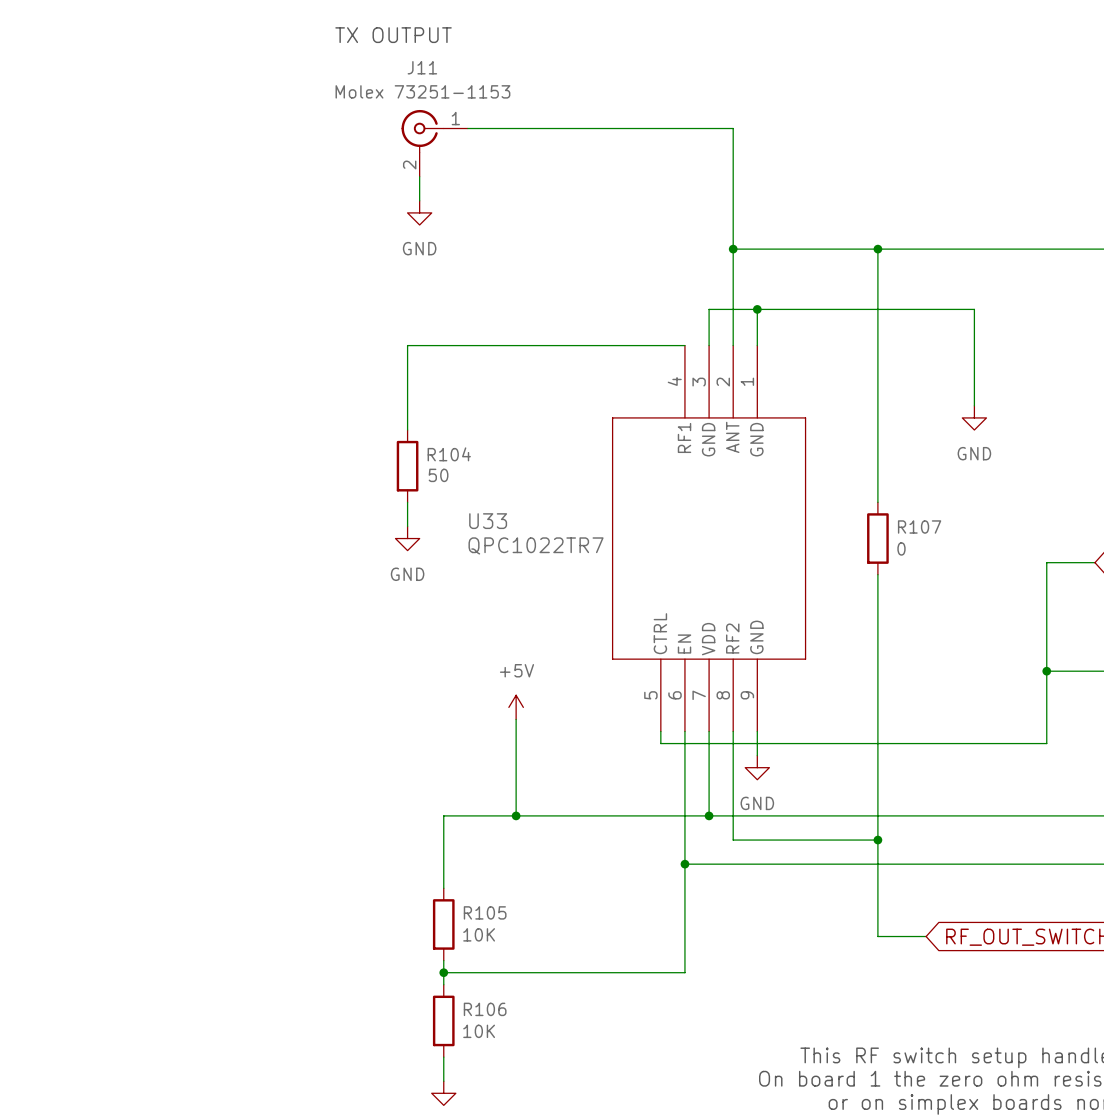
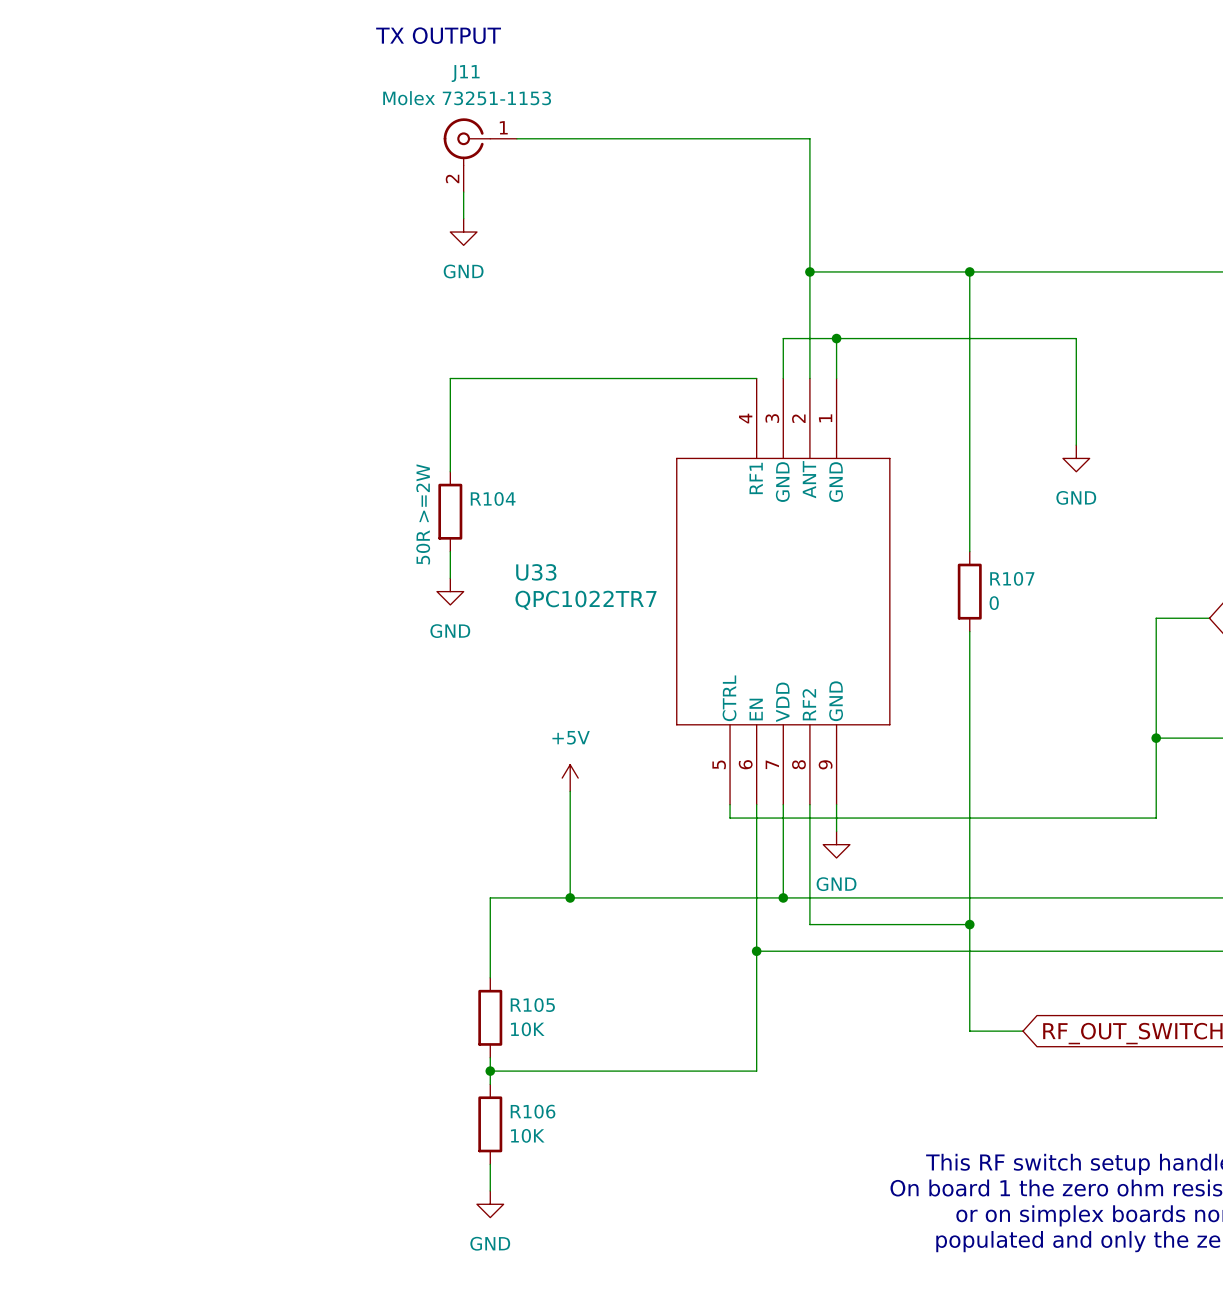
R104 value: 50 (438, 475) -> 50R >=2W (423, 514)

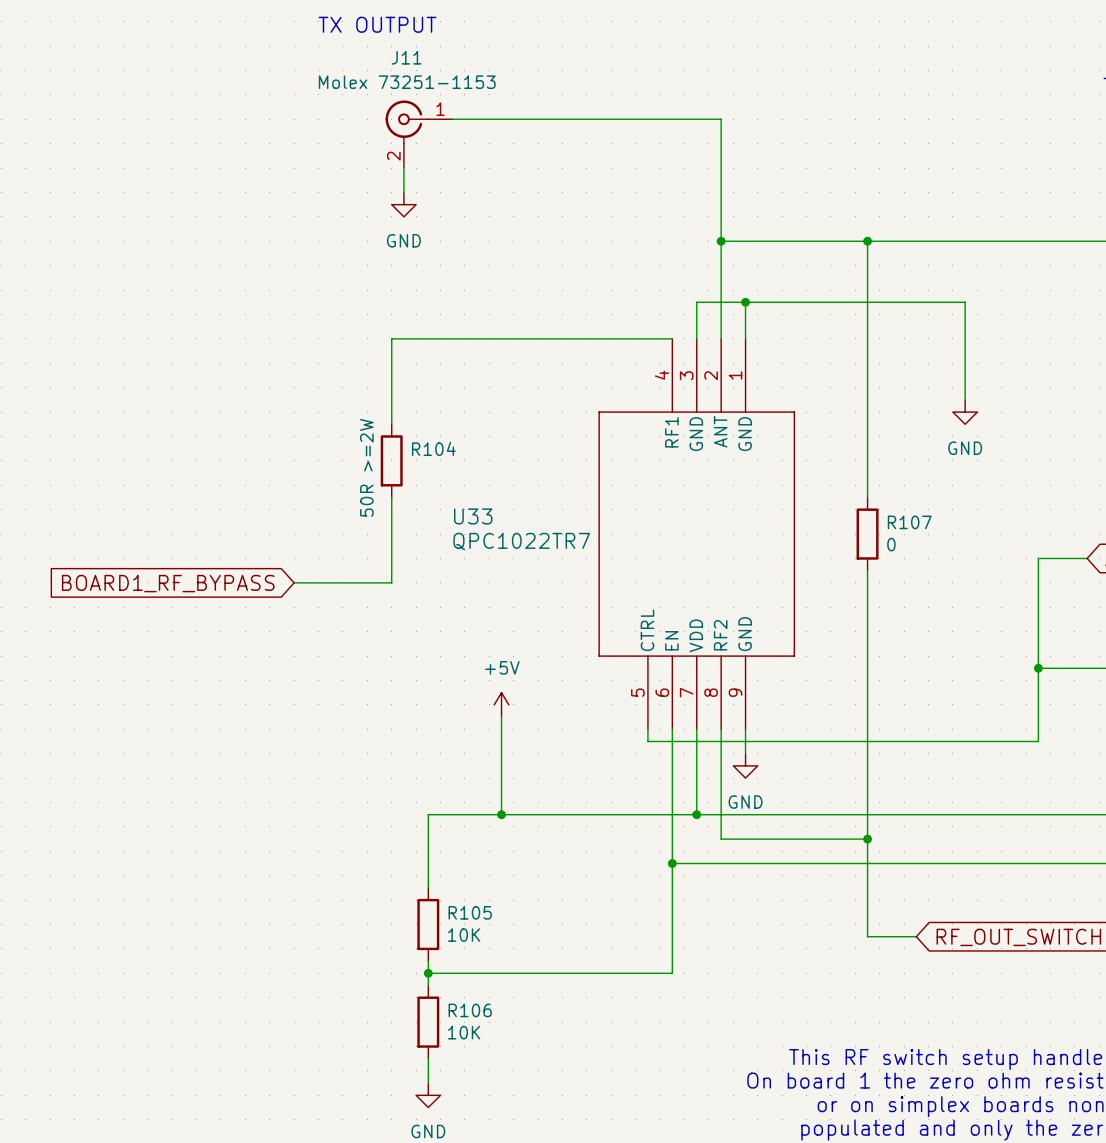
wire: none -> (391, 521) (391, 582) (294, 582)
power symbol: GND (450, 591) -> none
global label: none -> BOARD1_RF_BYPASS (168, 583)

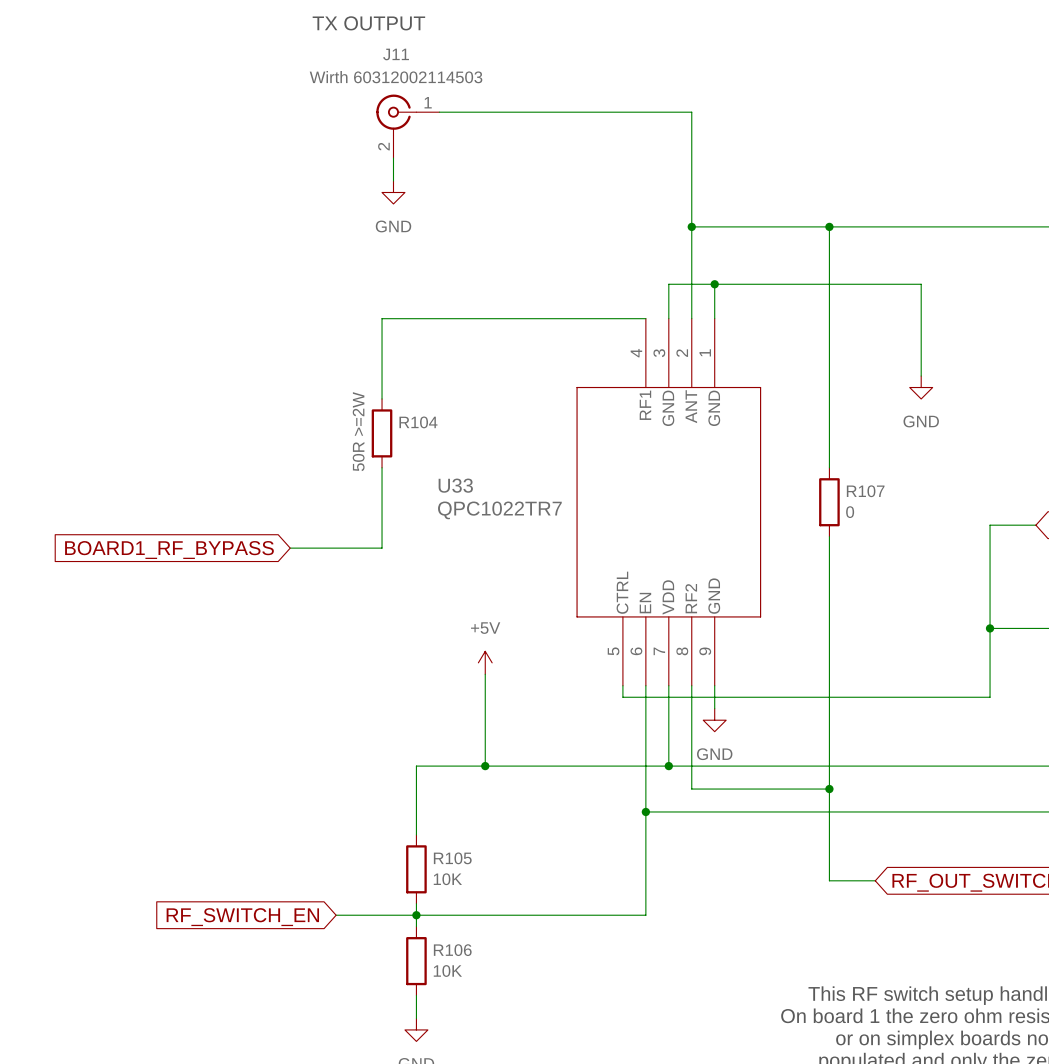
J11 value: Molex 73251-1153 (407, 82) -> Wirth 60312002114503 (396, 77)
wire: none -> (336, 915) (416, 915)
global label: none -> RF_SWITCH_EN (242, 917)

